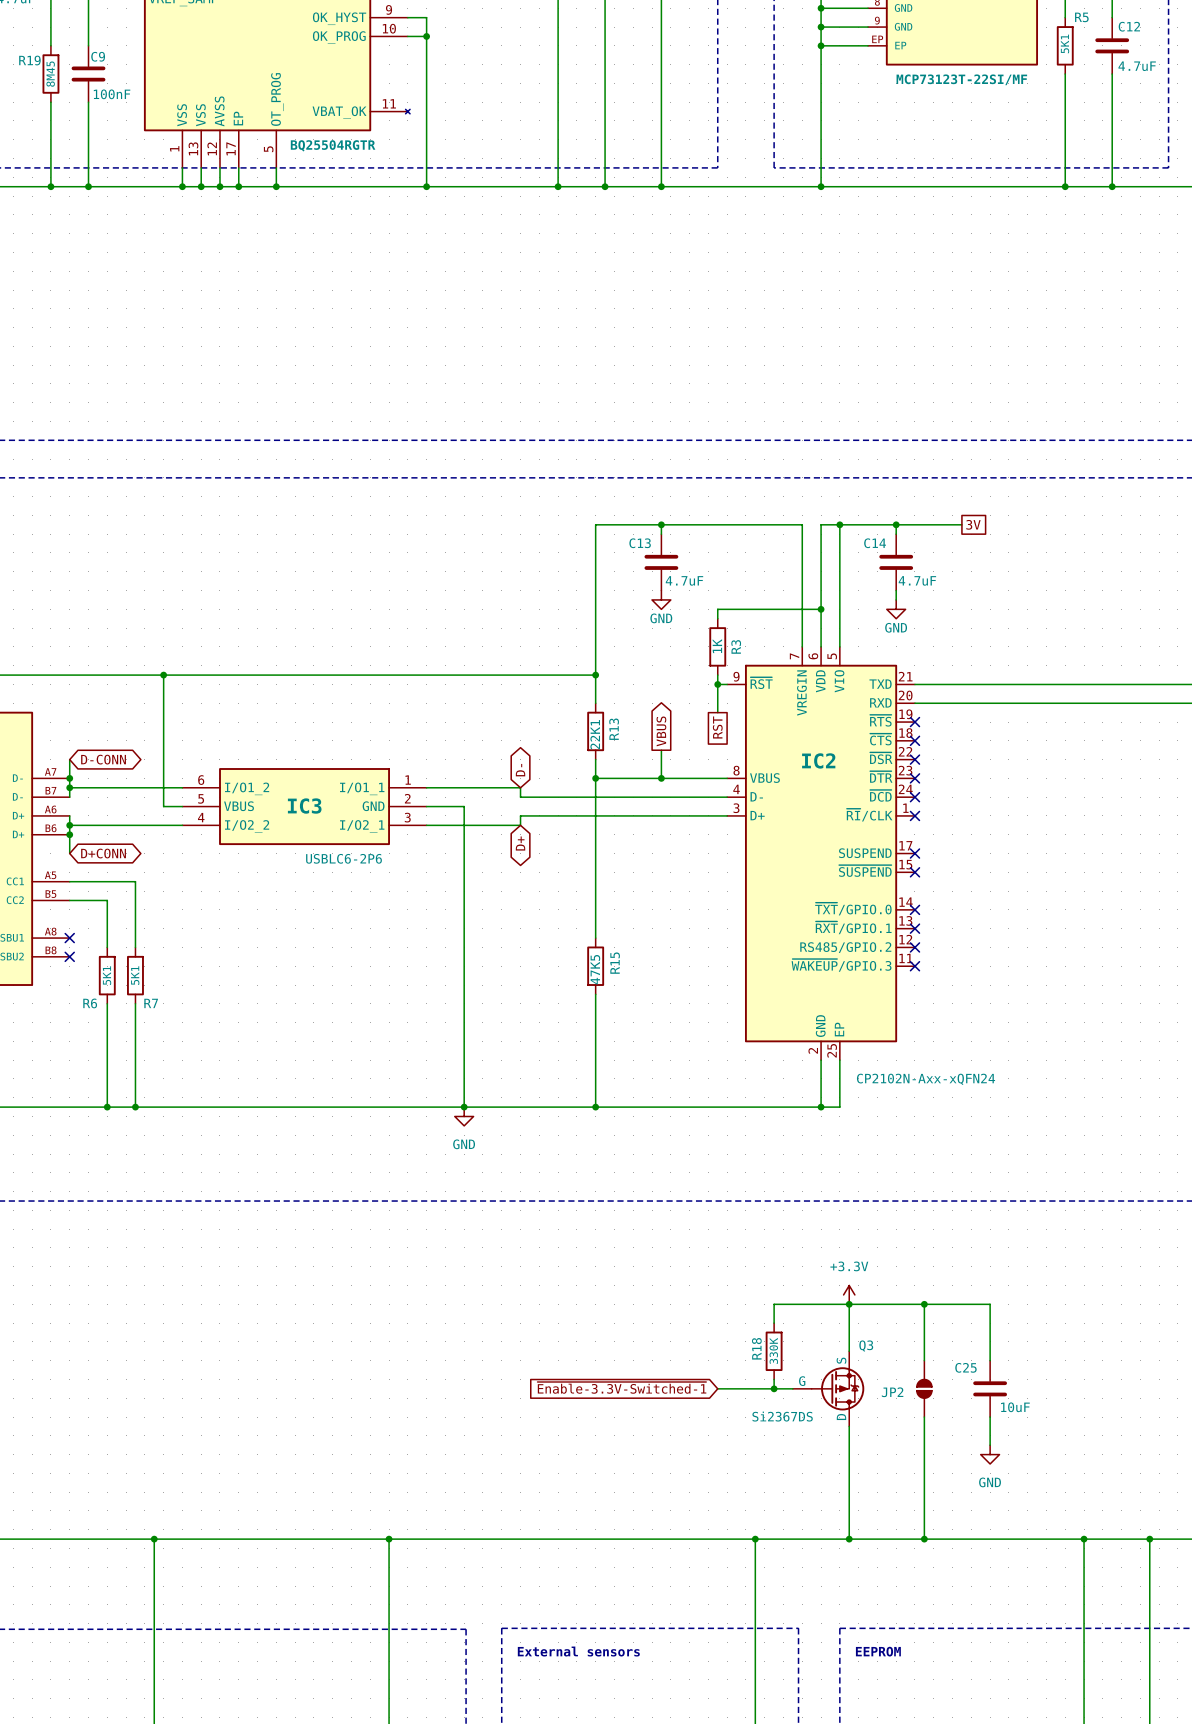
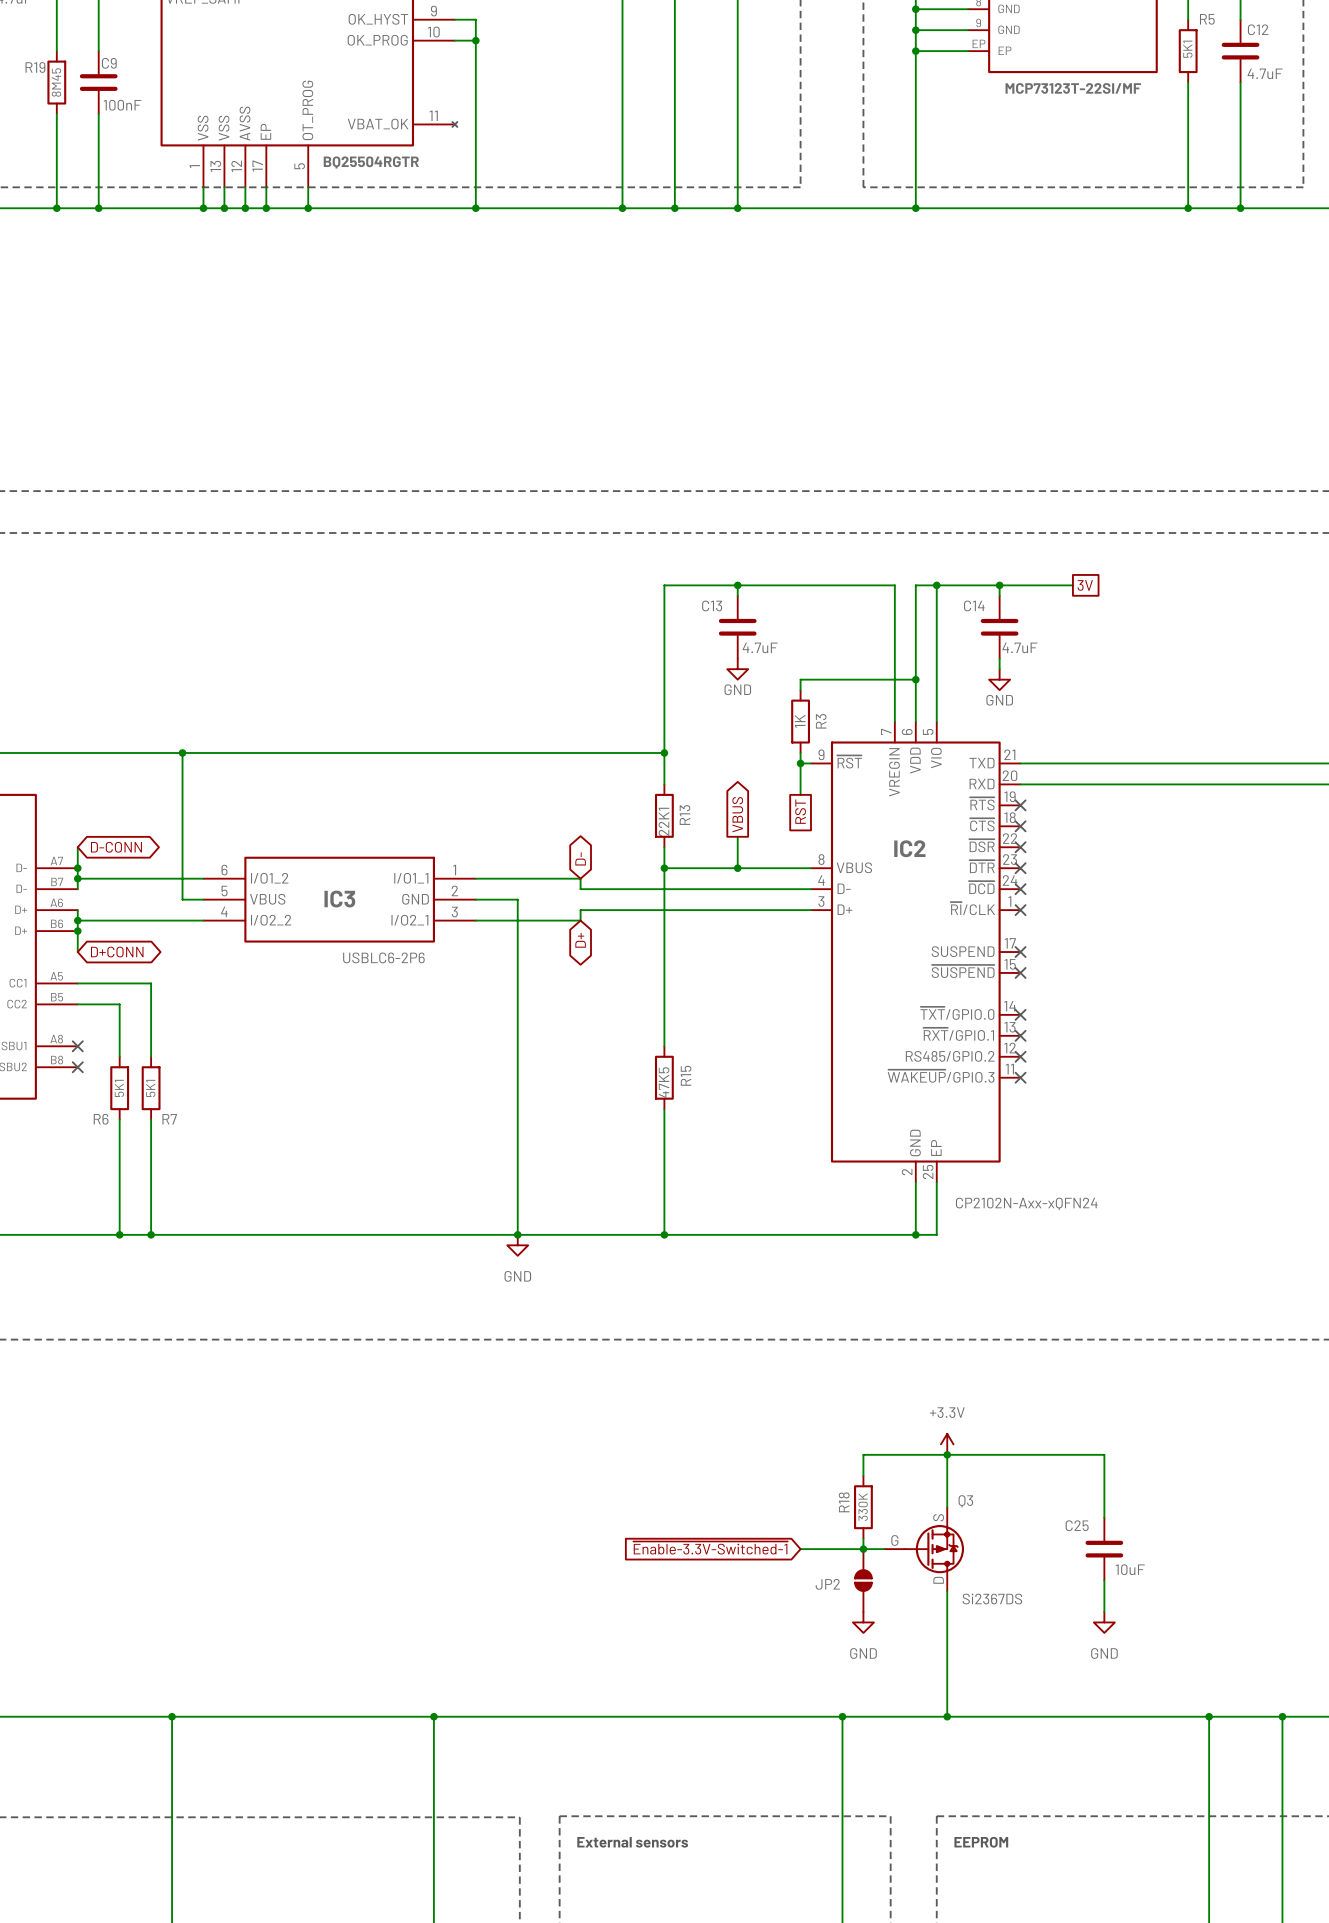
wire: (924, 1304) (924, 1360) -> none
junction: (924, 1304) -> none
JP2 position: (924, 1388) -> (863, 1580)
Q3 value position: Si2367DS (782, 1416) -> Si2367DS (992, 1599)
wire: (924, 1417) (924, 1539) -> none
power symbol: none -> GND (863, 1622)
junction: (924, 1539) -> none

